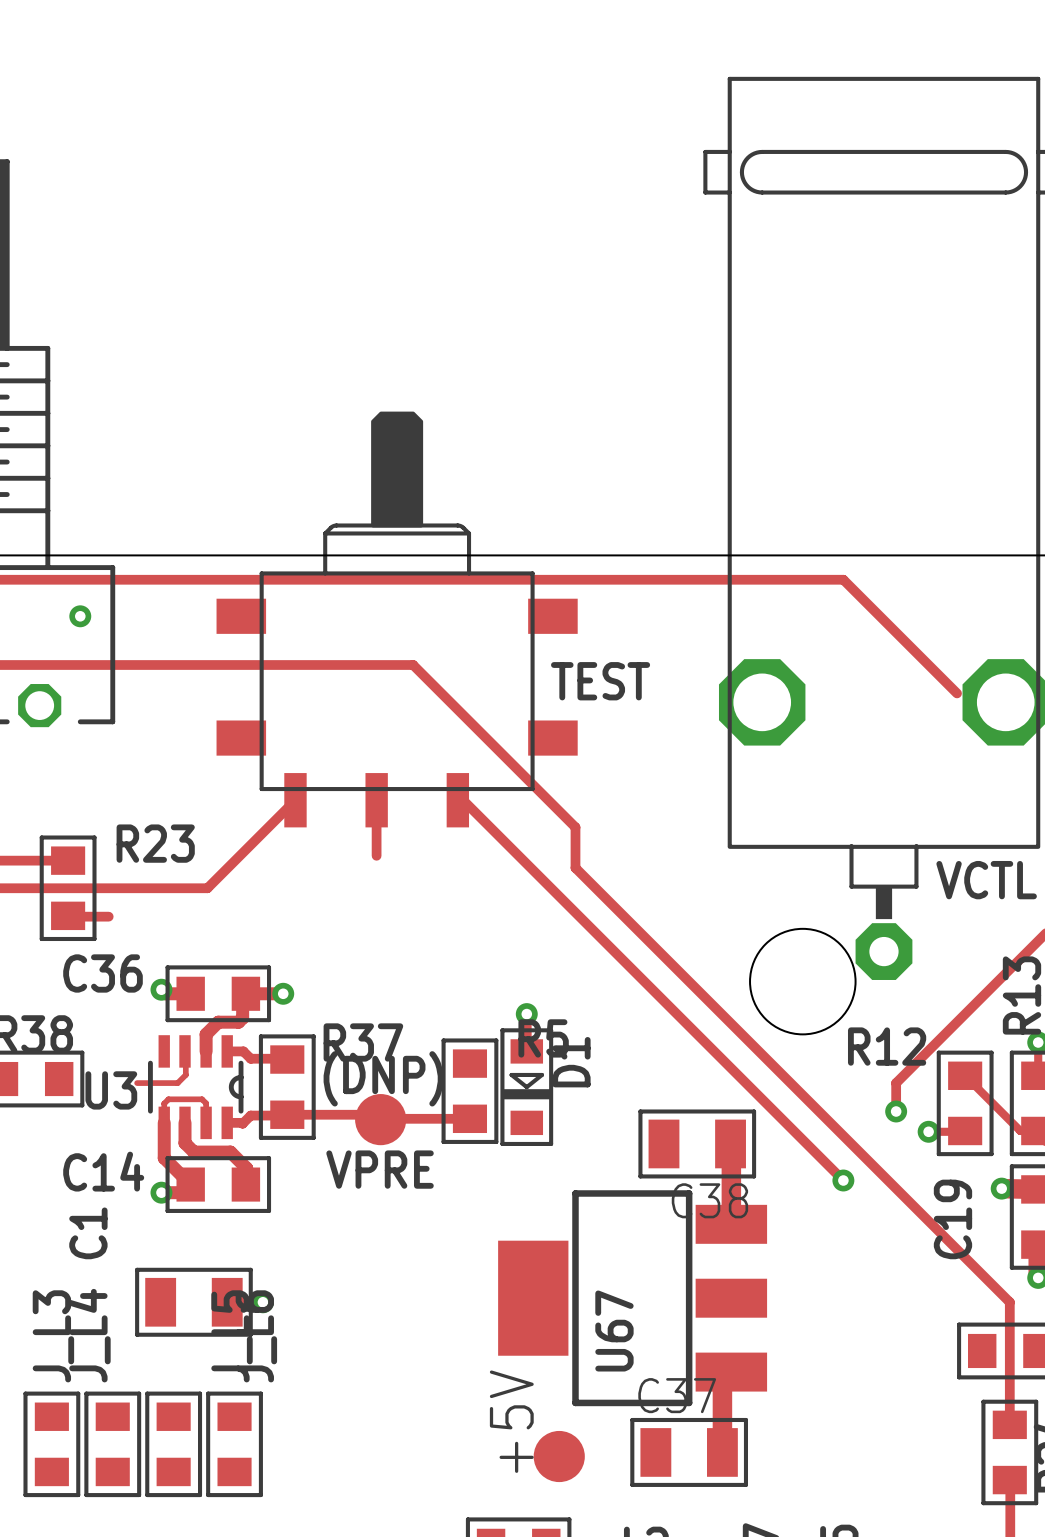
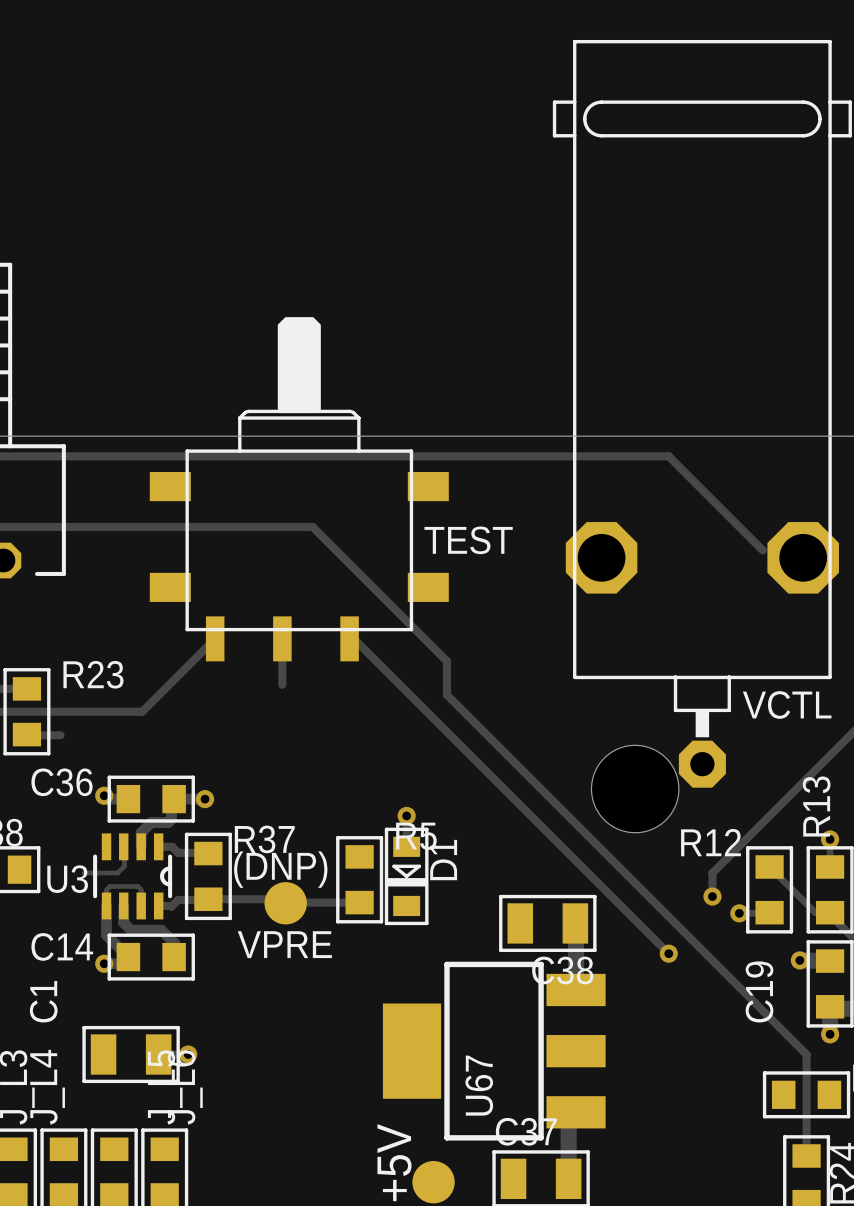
via: (80, 616) -> none

